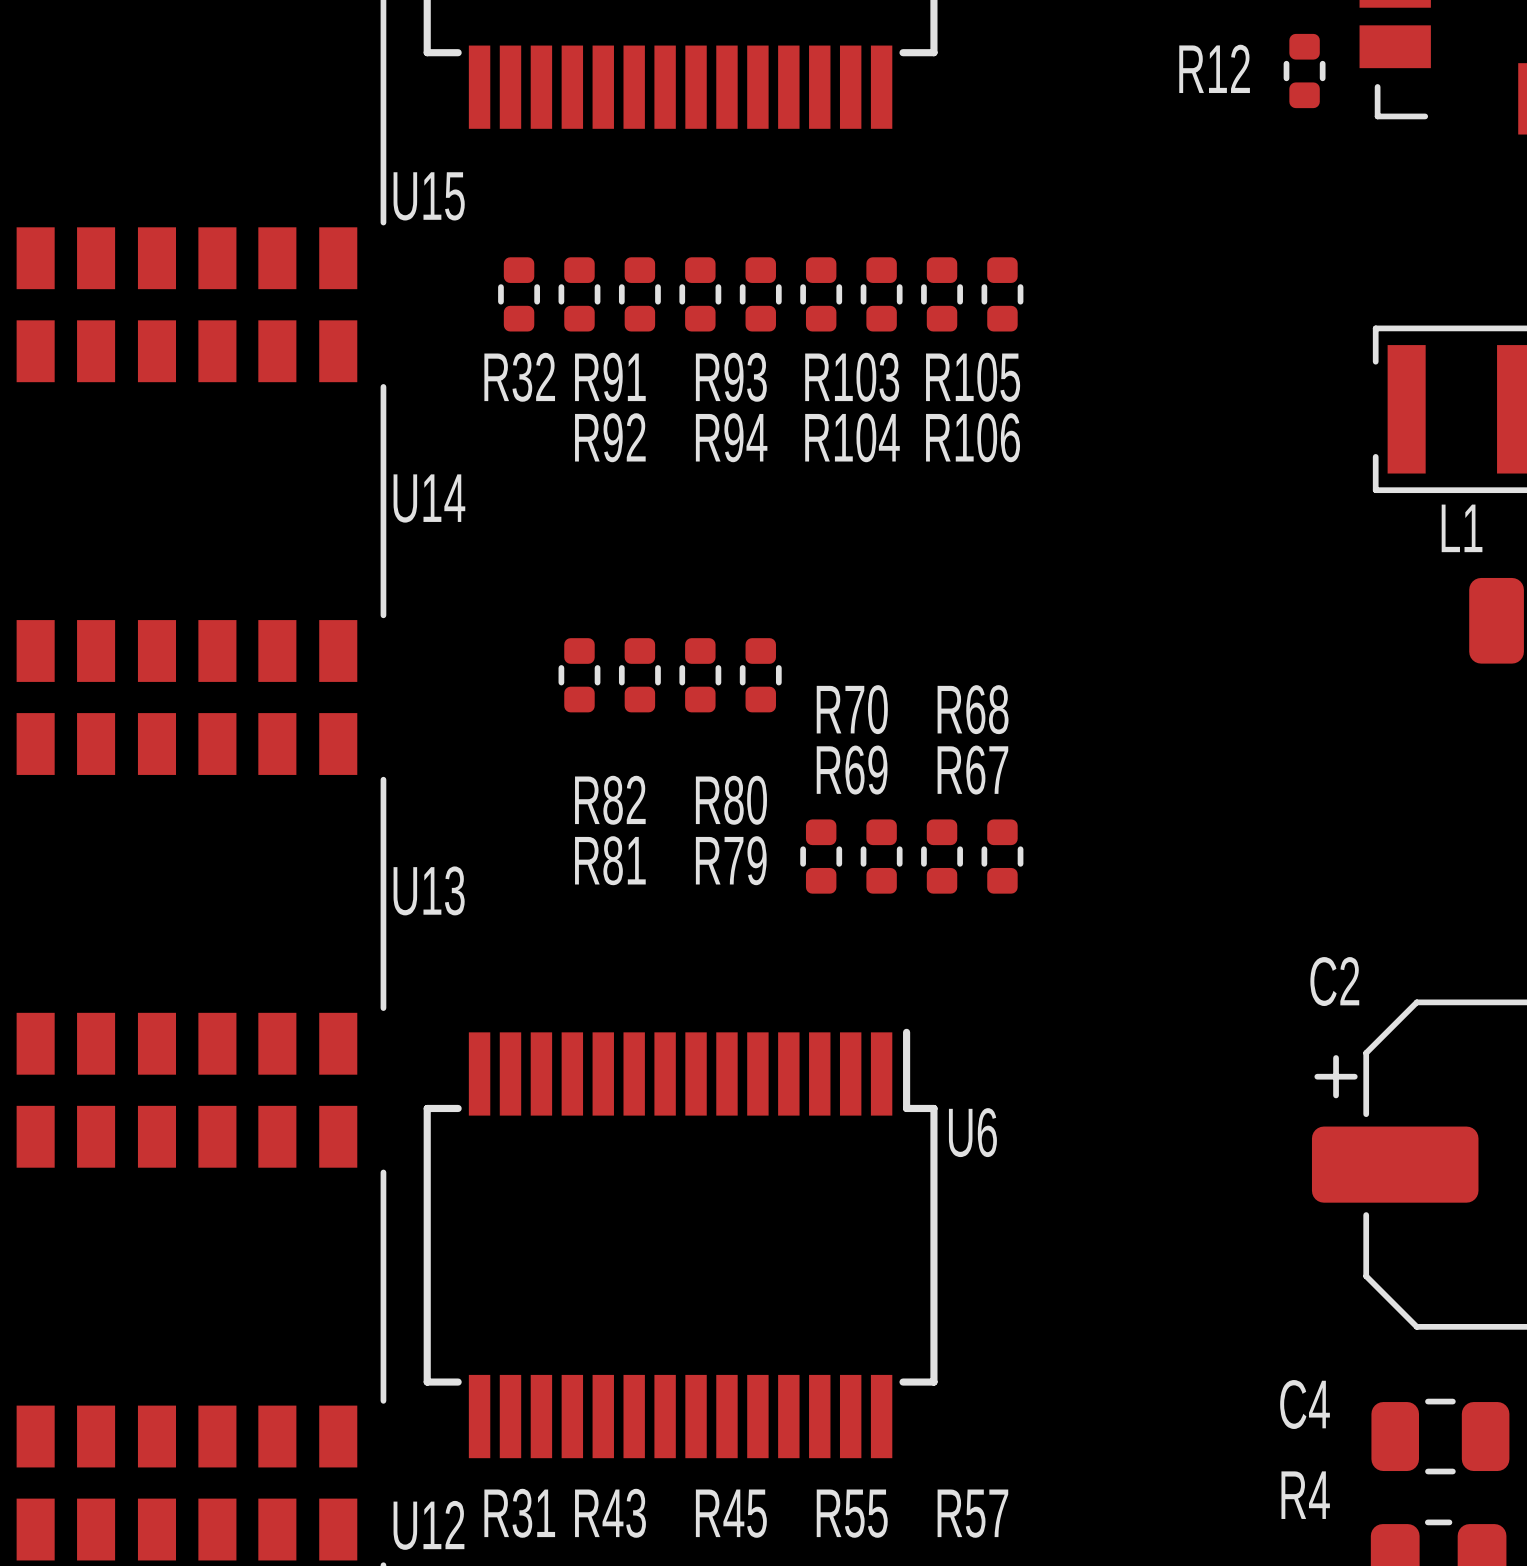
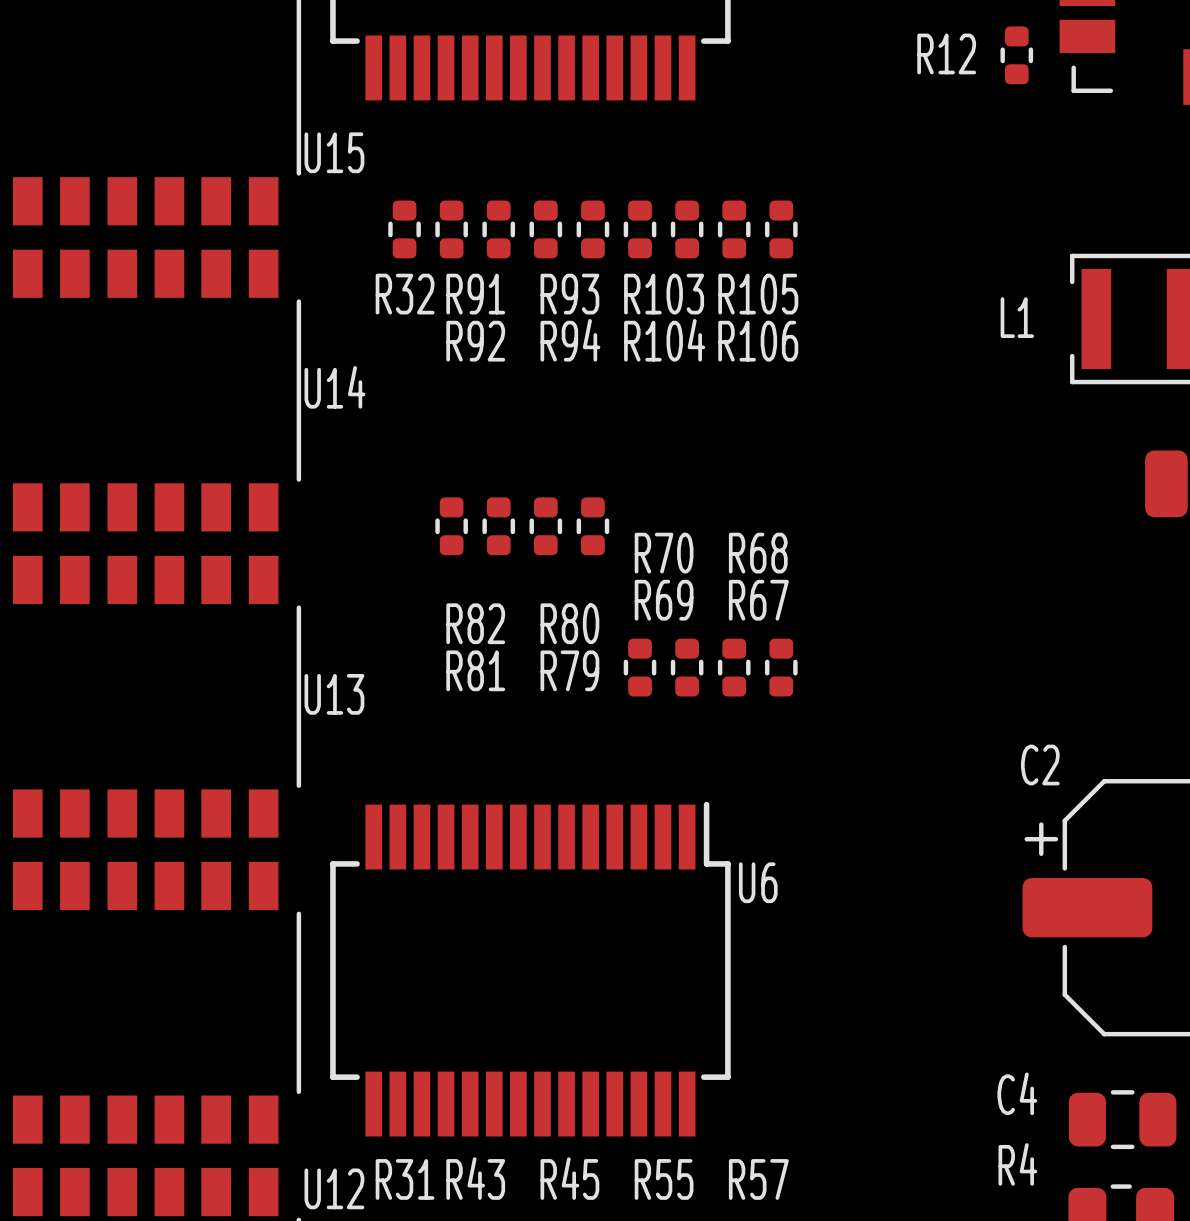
L1 name position: L1 (1462, 528) -> L1 (1017, 317)

